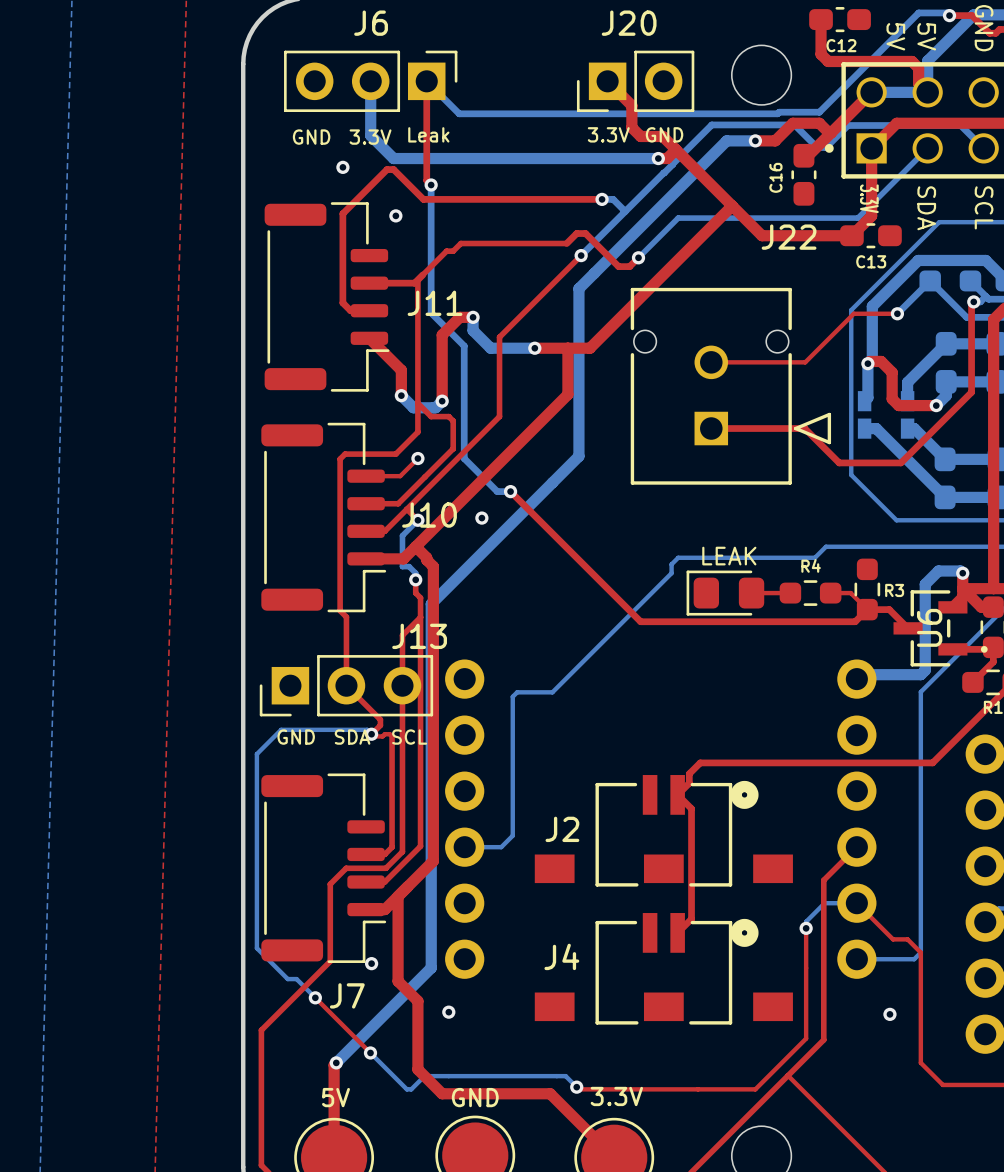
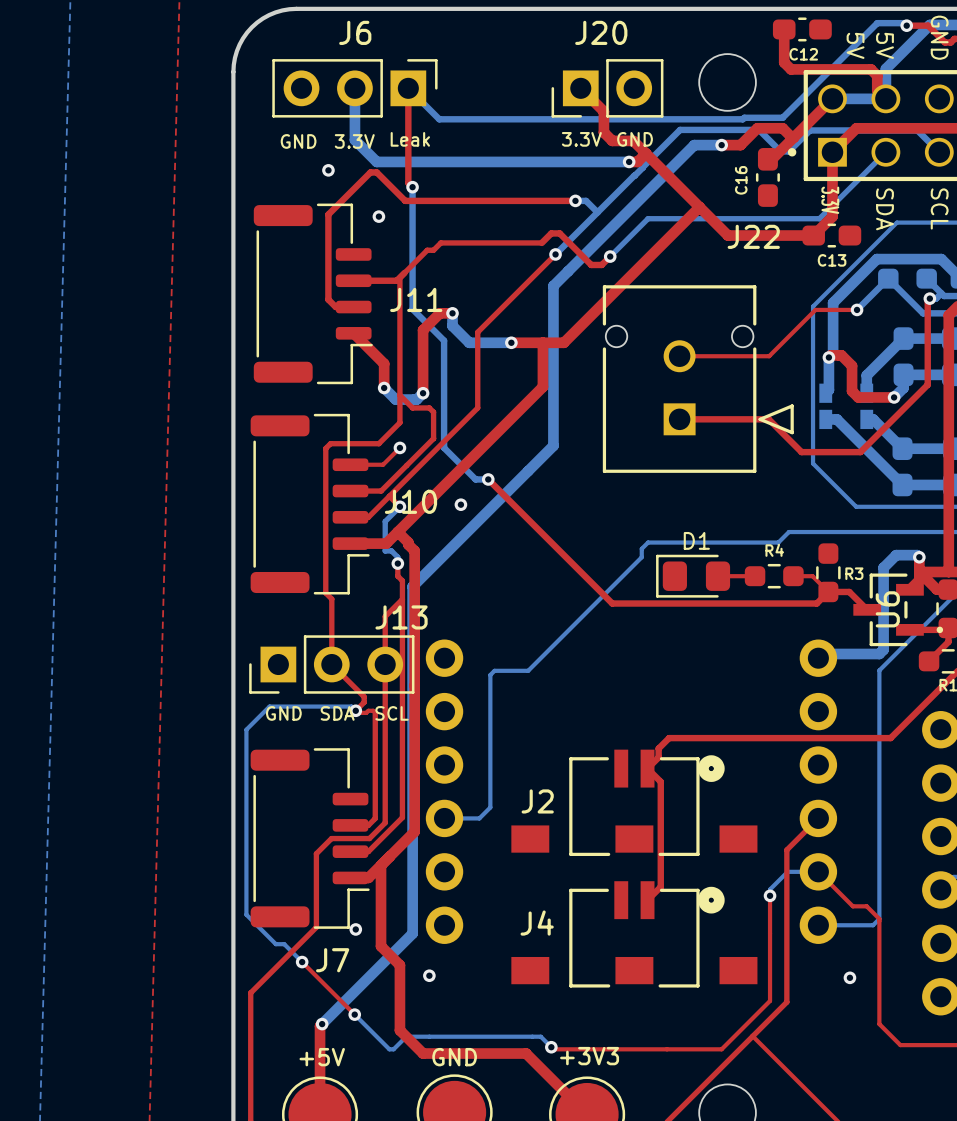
LEAK name: LEAK (729, 556) -> D1 (696, 540)
3.3V name: 3.3V (616, 1096) -> +3V3 (589, 1056)
5V name: 5V (335, 1097) -> +5V (322, 1057)

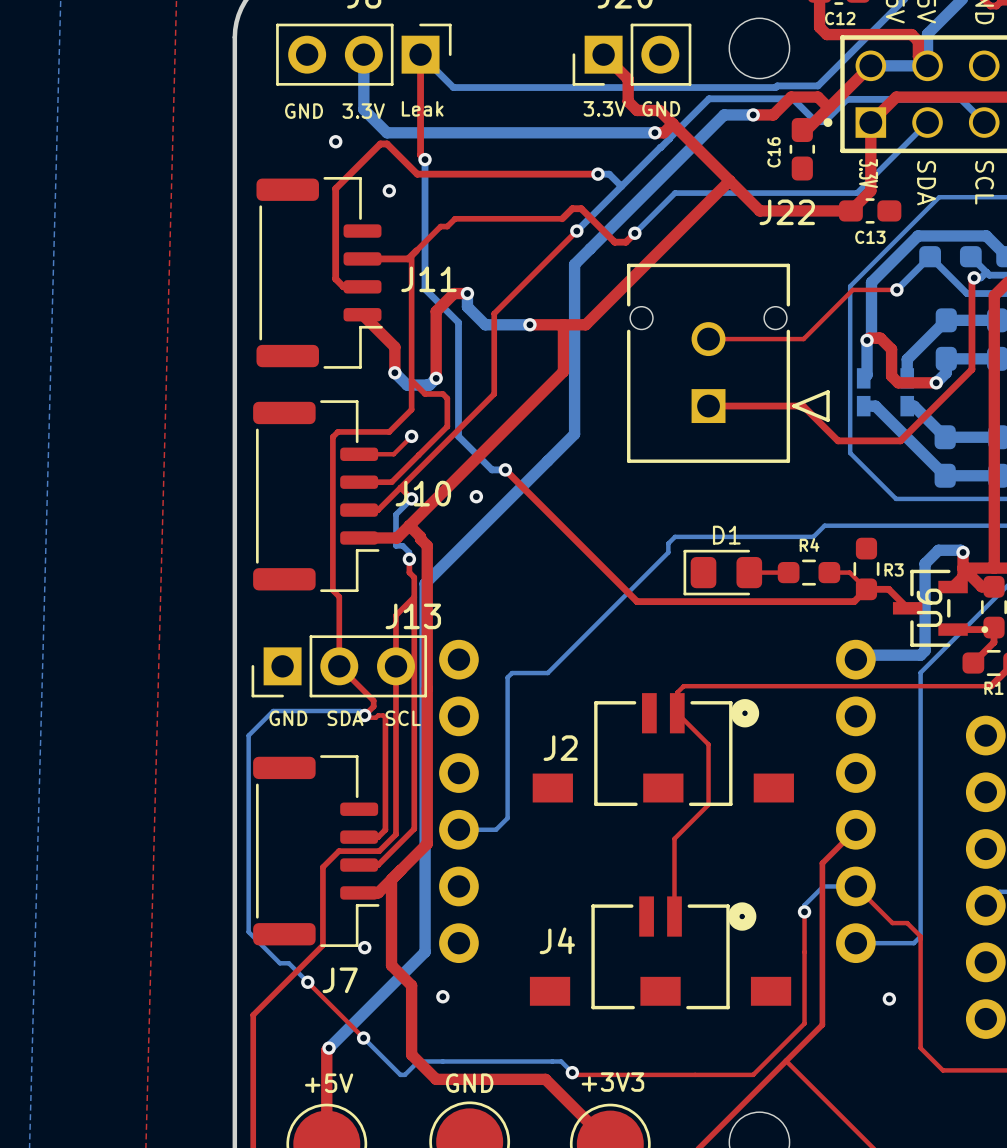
top track: (945, 683) (890, 738) (669, 738) (658, 748) (658, 757) (647, 768) (660, 781) (660, 886) (647, 900) -> (990, 686) (683, 686) (677, 692) (677, 713) (708, 744) (708, 804) (674, 838) (674, 916)
J2 position: (634, 802) -> (663, 749)

